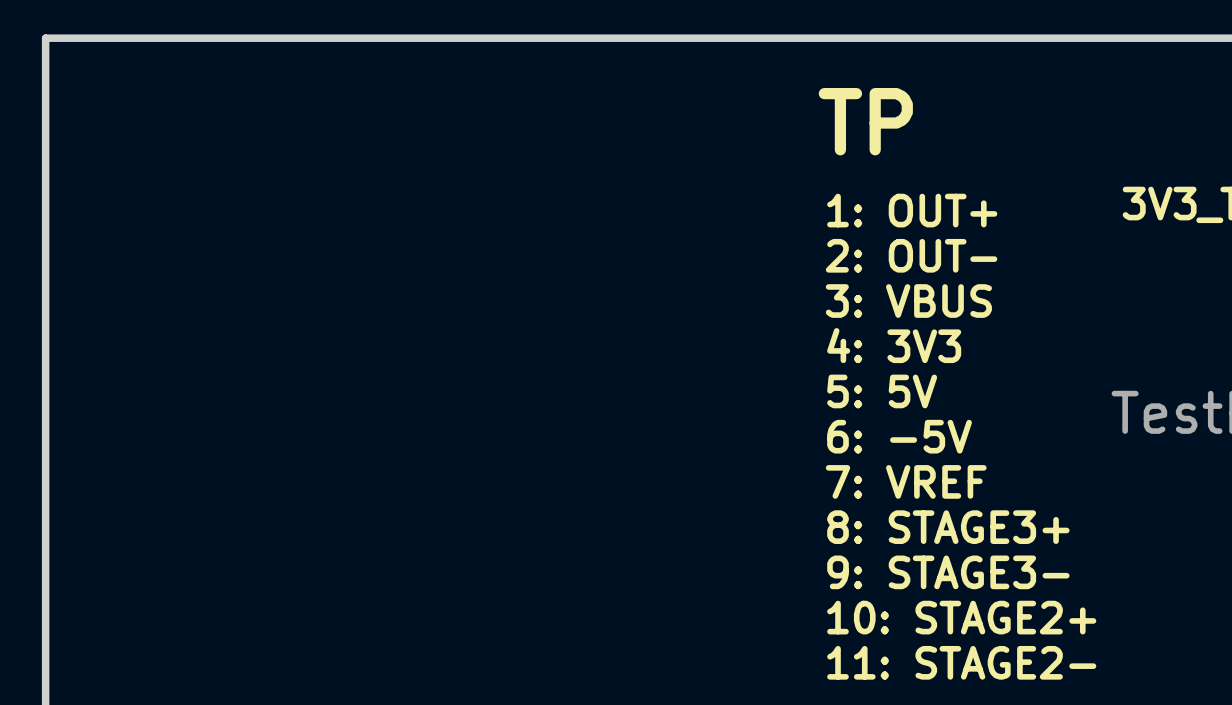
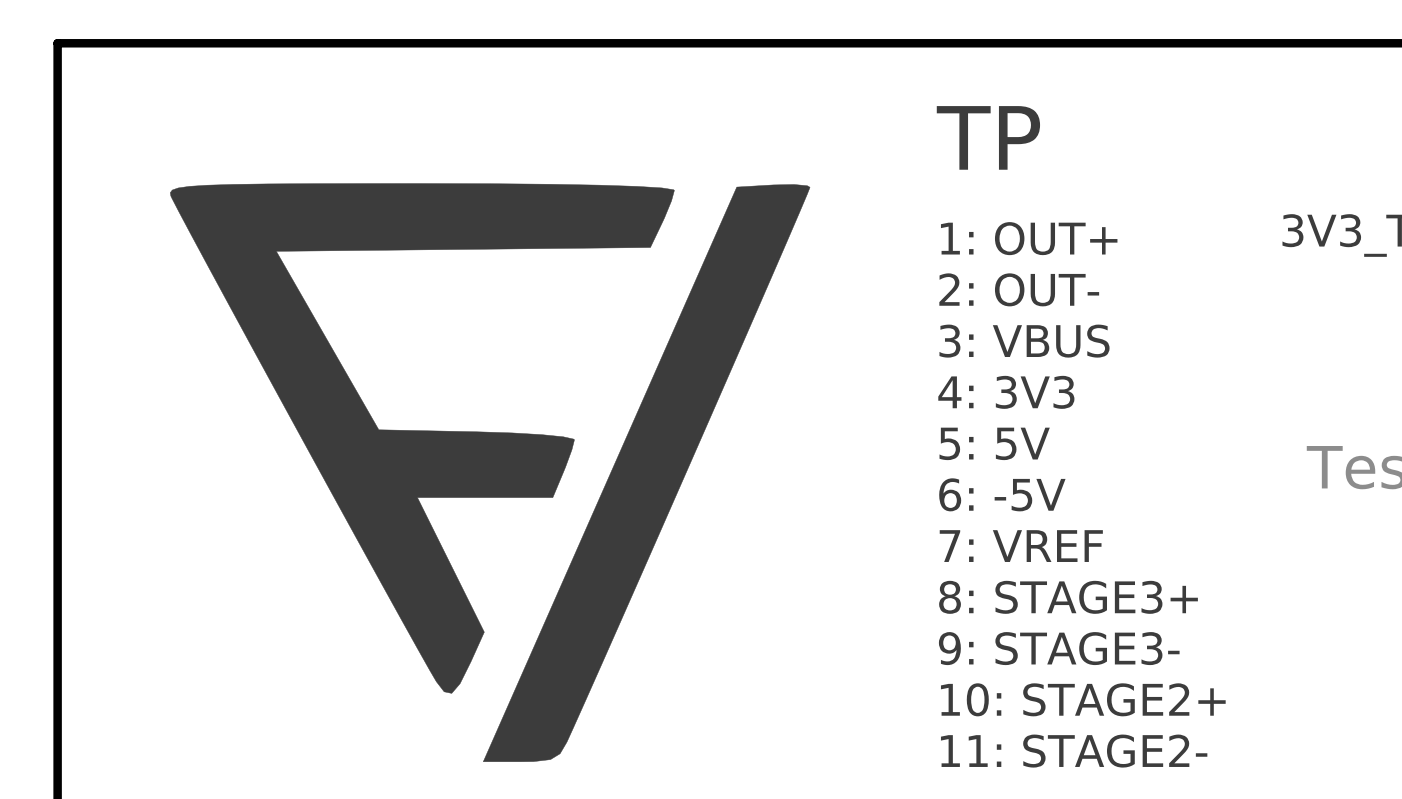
drawing: none -> [170, 183, 811, 762]

